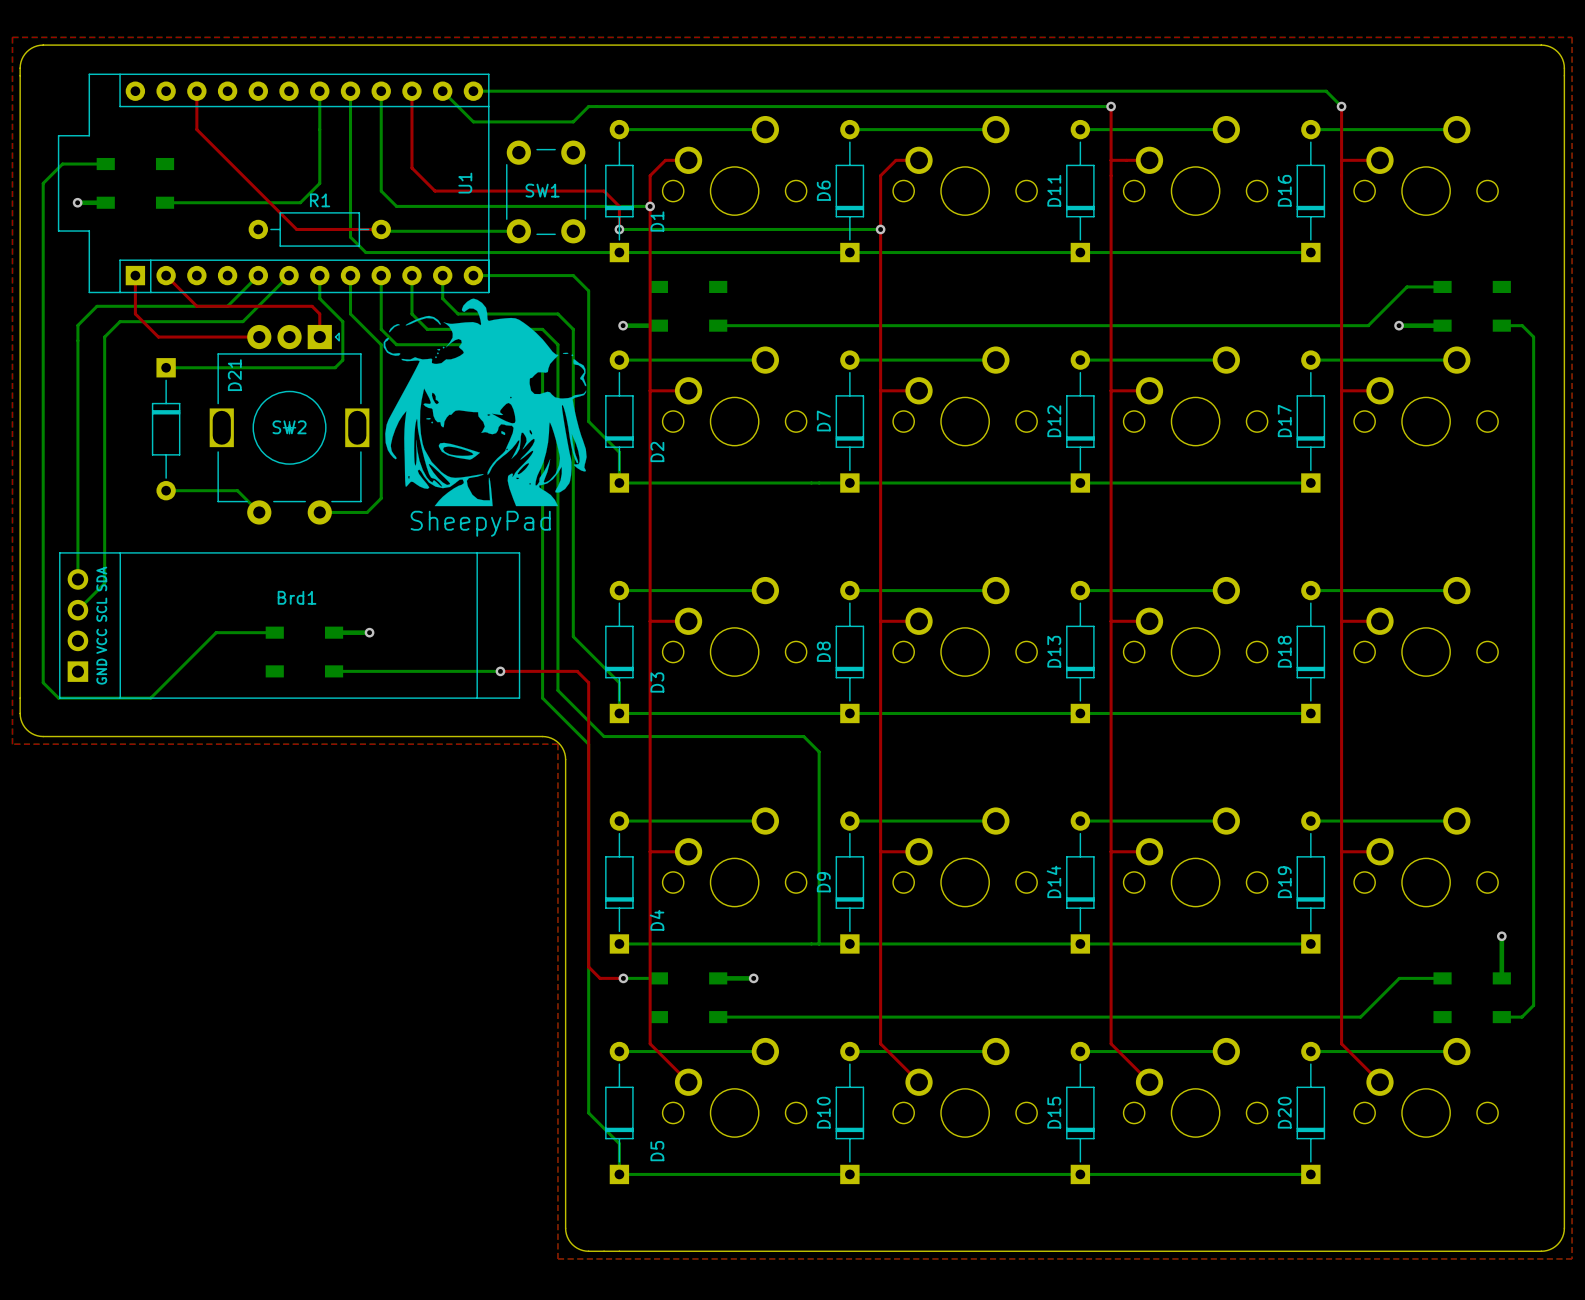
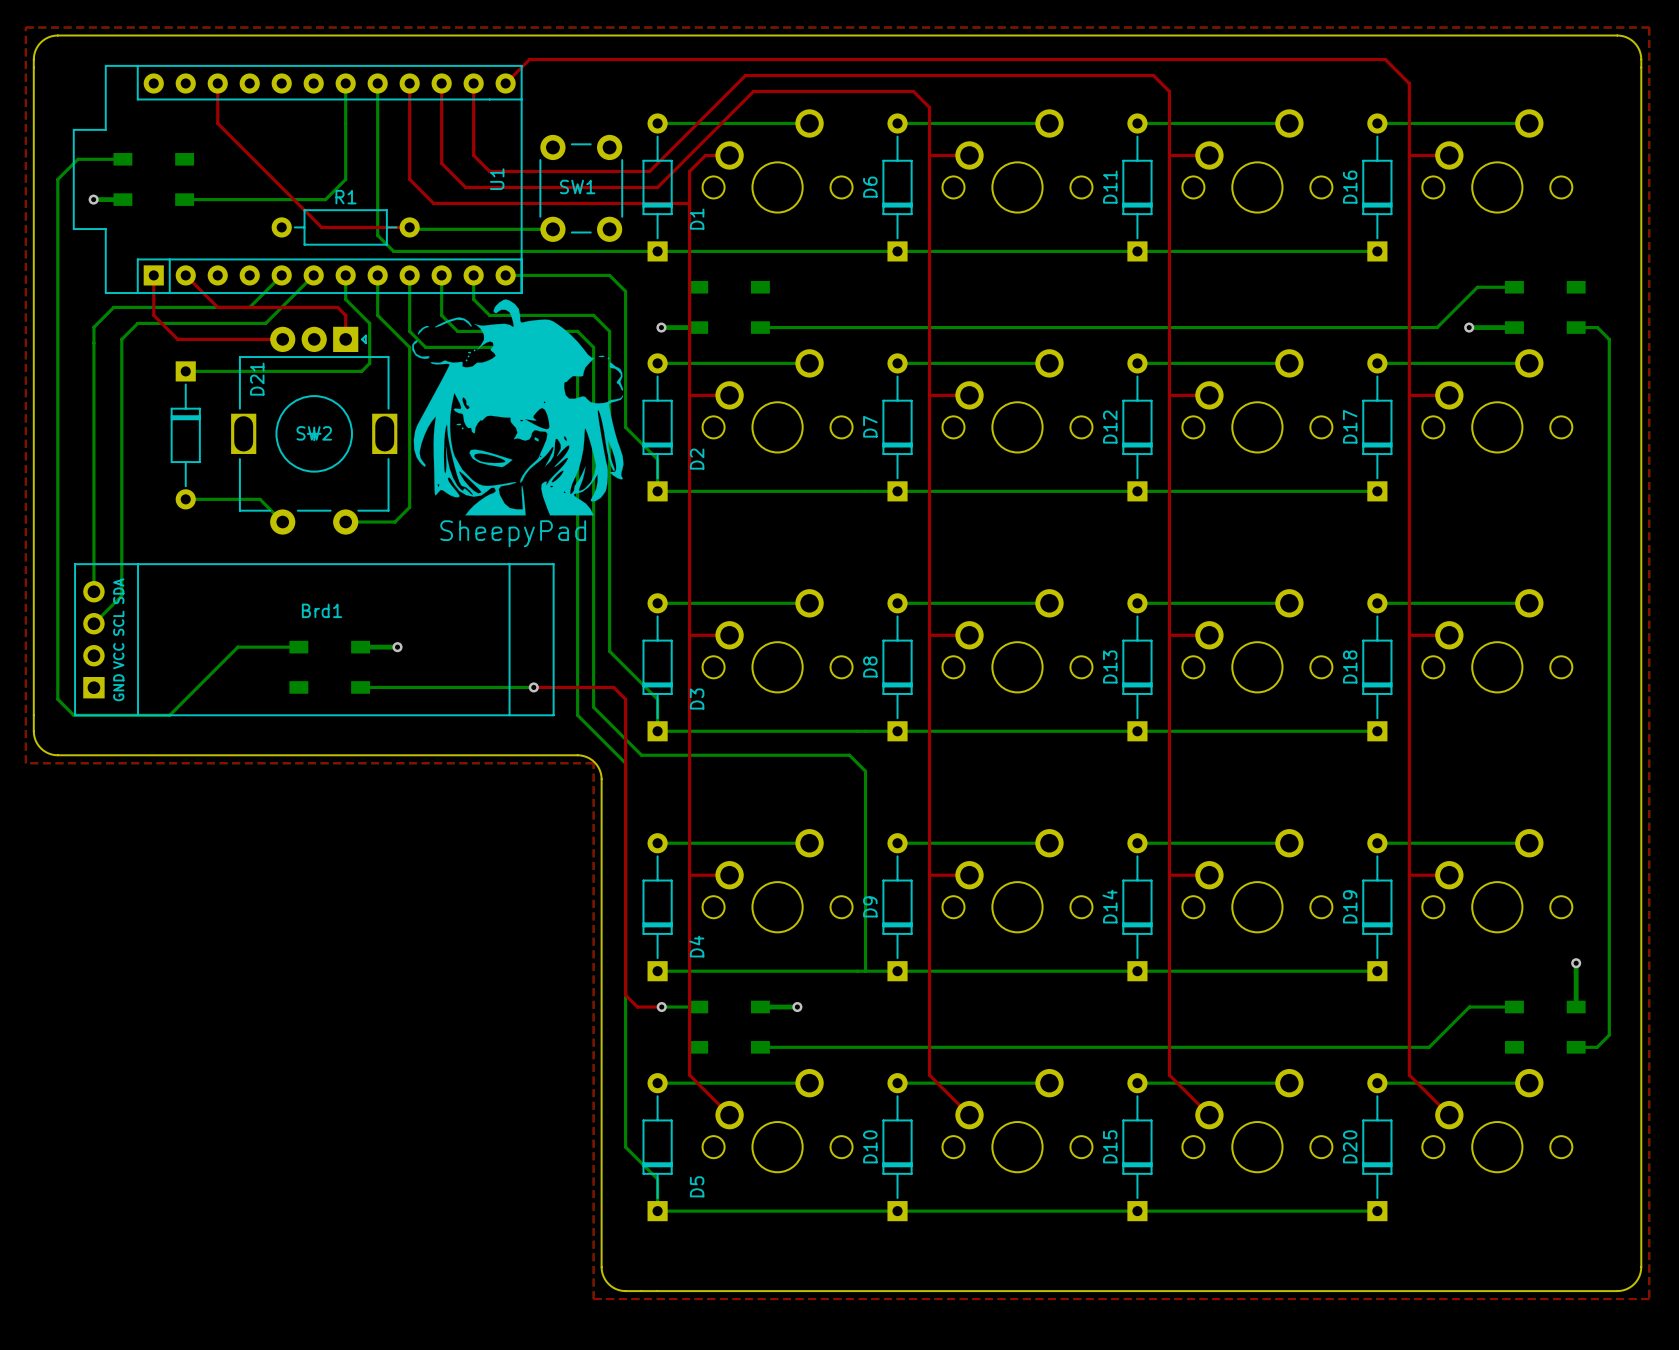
top track: none -> (409, 83) (409, 179) (433, 203) (689, 203)
bottom track: (381, 91) (381, 191) (396, 206) (650, 206) -> none
top track: none -> (473, 83) (473, 155) (489, 171) (649, 171) (745, 75) (1153, 75) (1169, 91) (1169, 99)
bottom track: (442, 91) (473, 121) (573, 121) (588, 106) (1111, 106) -> none
top track: none -> (505, 83) (529, 59) (1385, 59) (1409, 83) (1409, 99)
bottom track: (473, 91) (1326, 91) (1341, 106) -> none
via: (1111, 106) -> none
via: (1341, 106) -> none
top track: (895, 160) (880, 175) -> (945, 155) (929, 155)
top track: (604, 191) (619, 206) (619, 229) -> (641, 187) (657, 187) (753, 91) (913, 91) (929, 107) (929, 171)
via: (650, 206) -> none
bottom track: (619, 229) (880, 229) -> none
via: (619, 229) -> none
via: (880, 229) -> none

